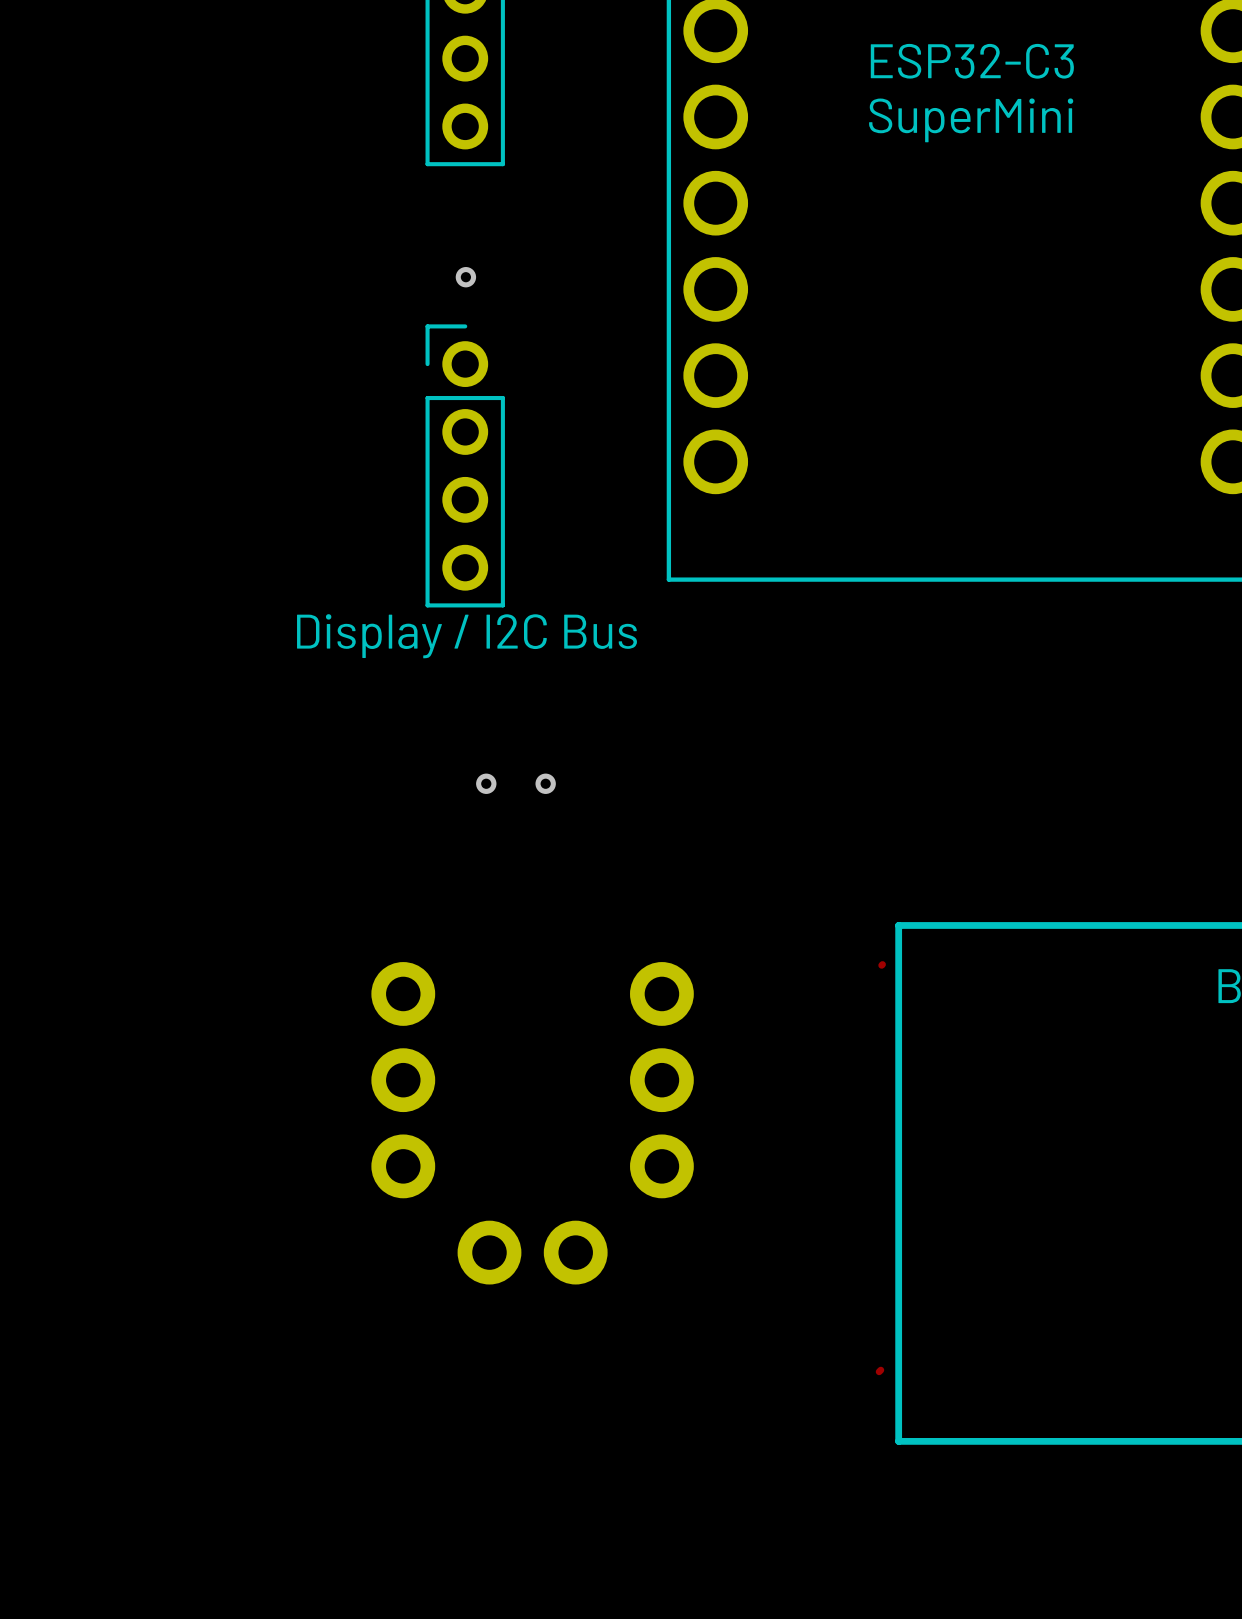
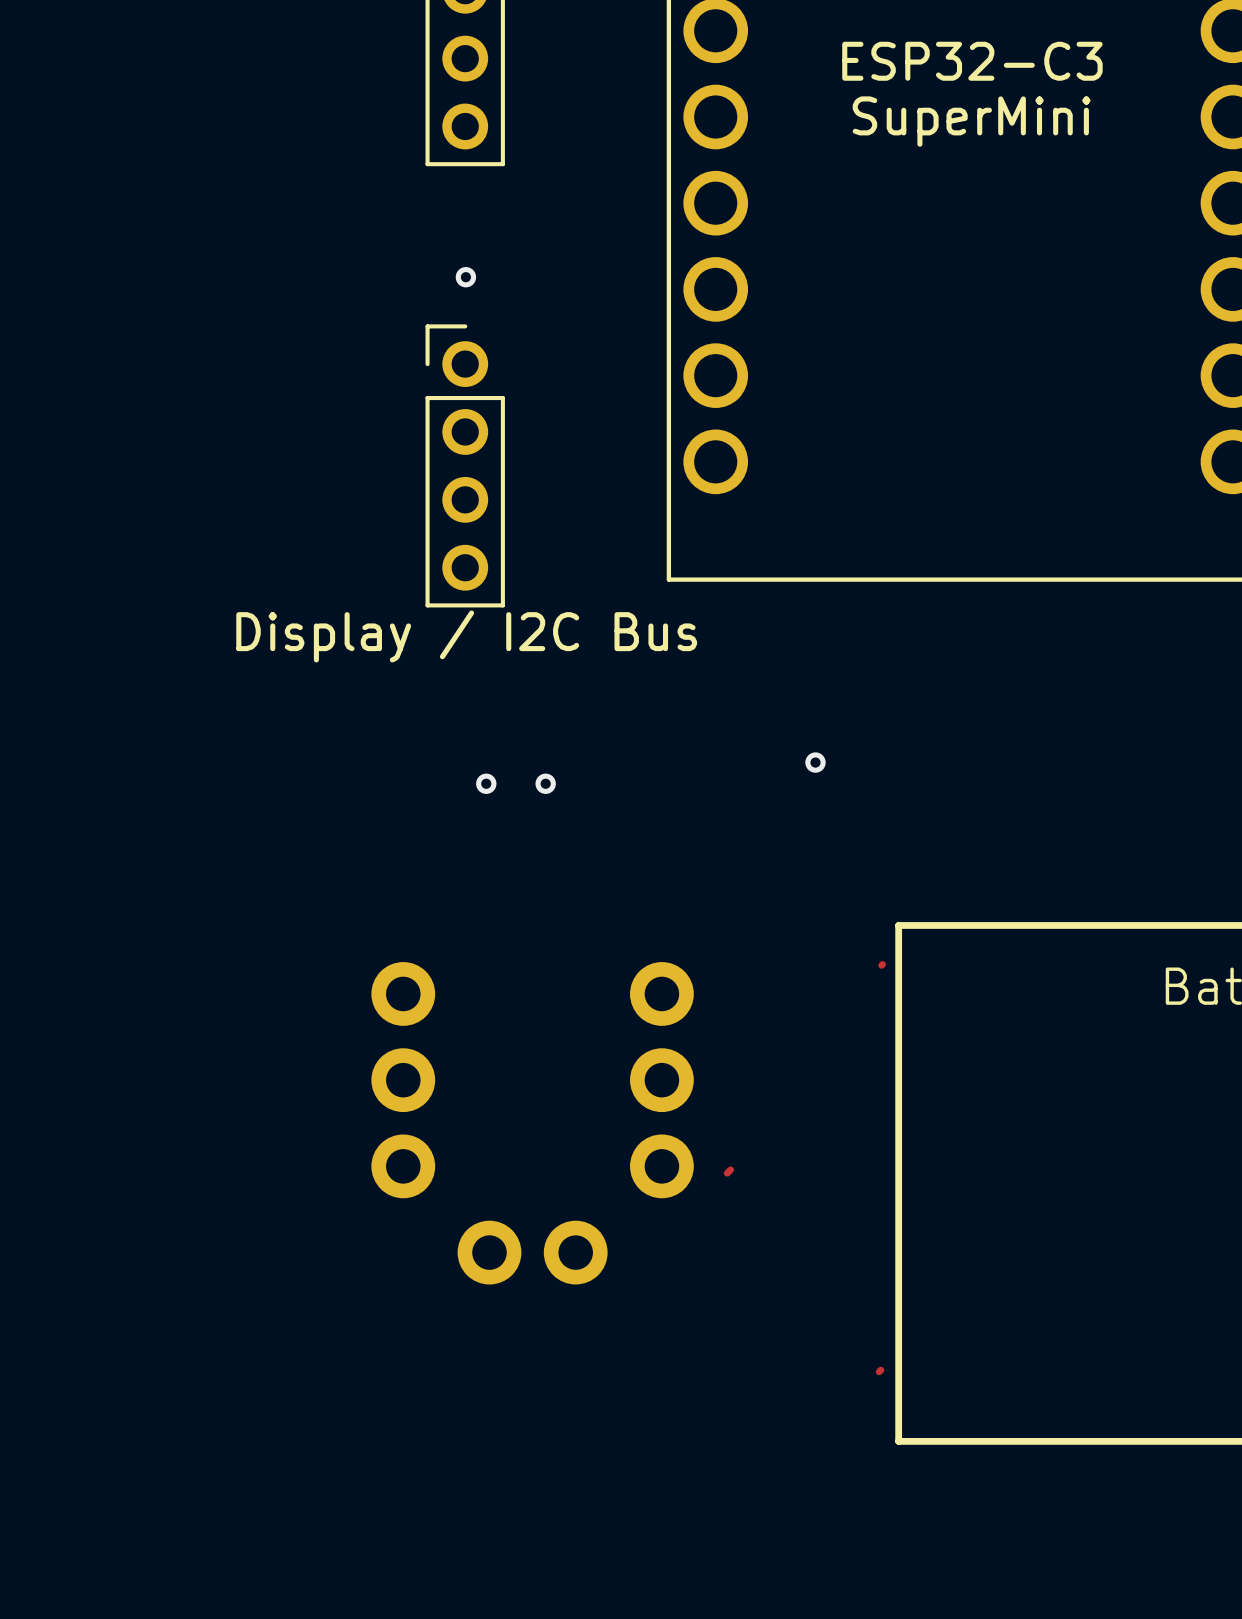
via: none -> (815, 762)
top track: none -> (730, 1169) (727, 1173)

